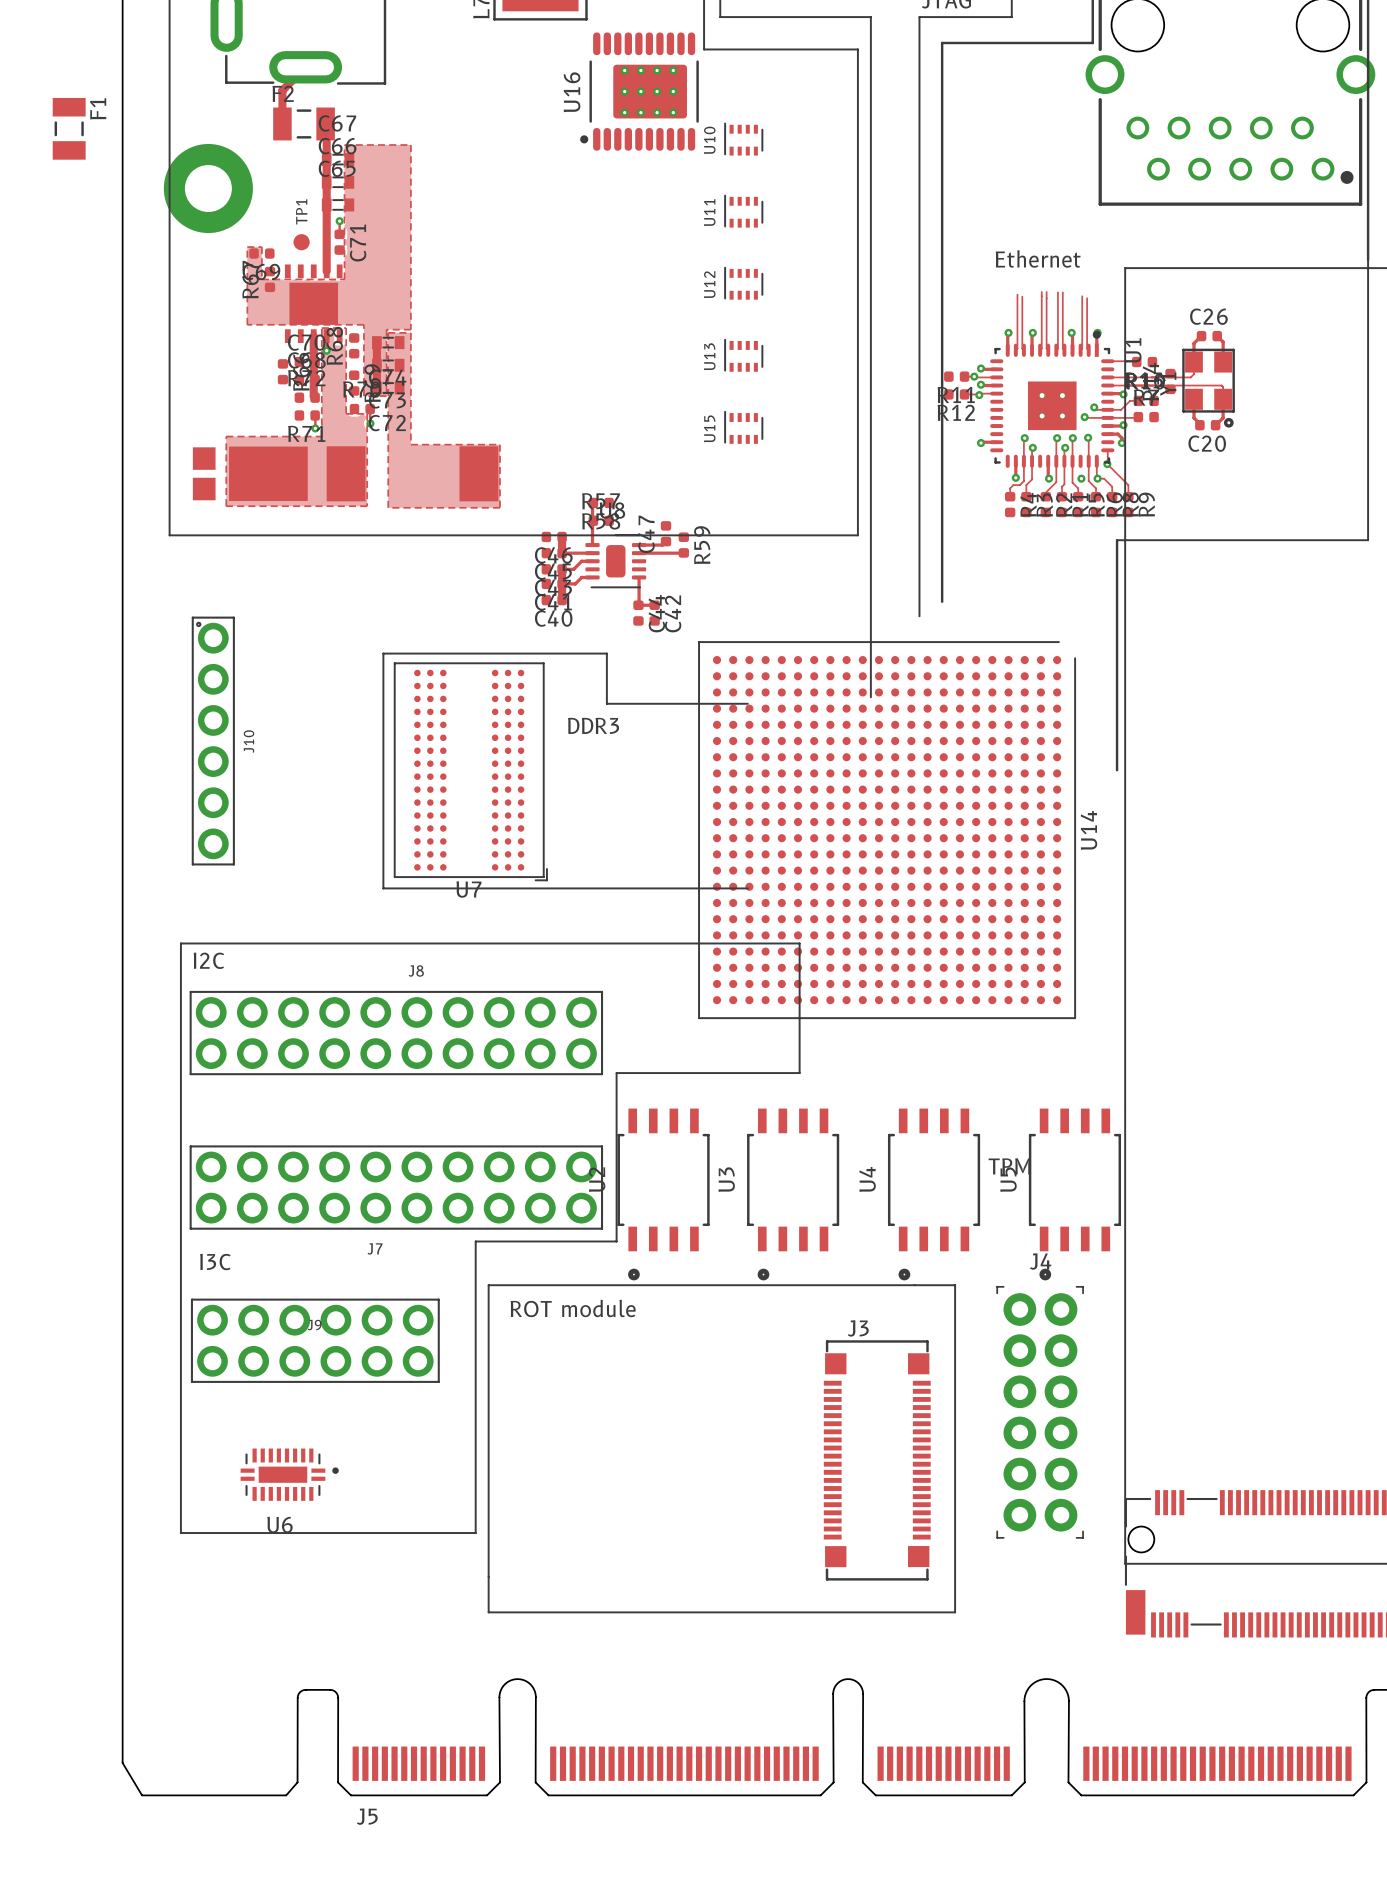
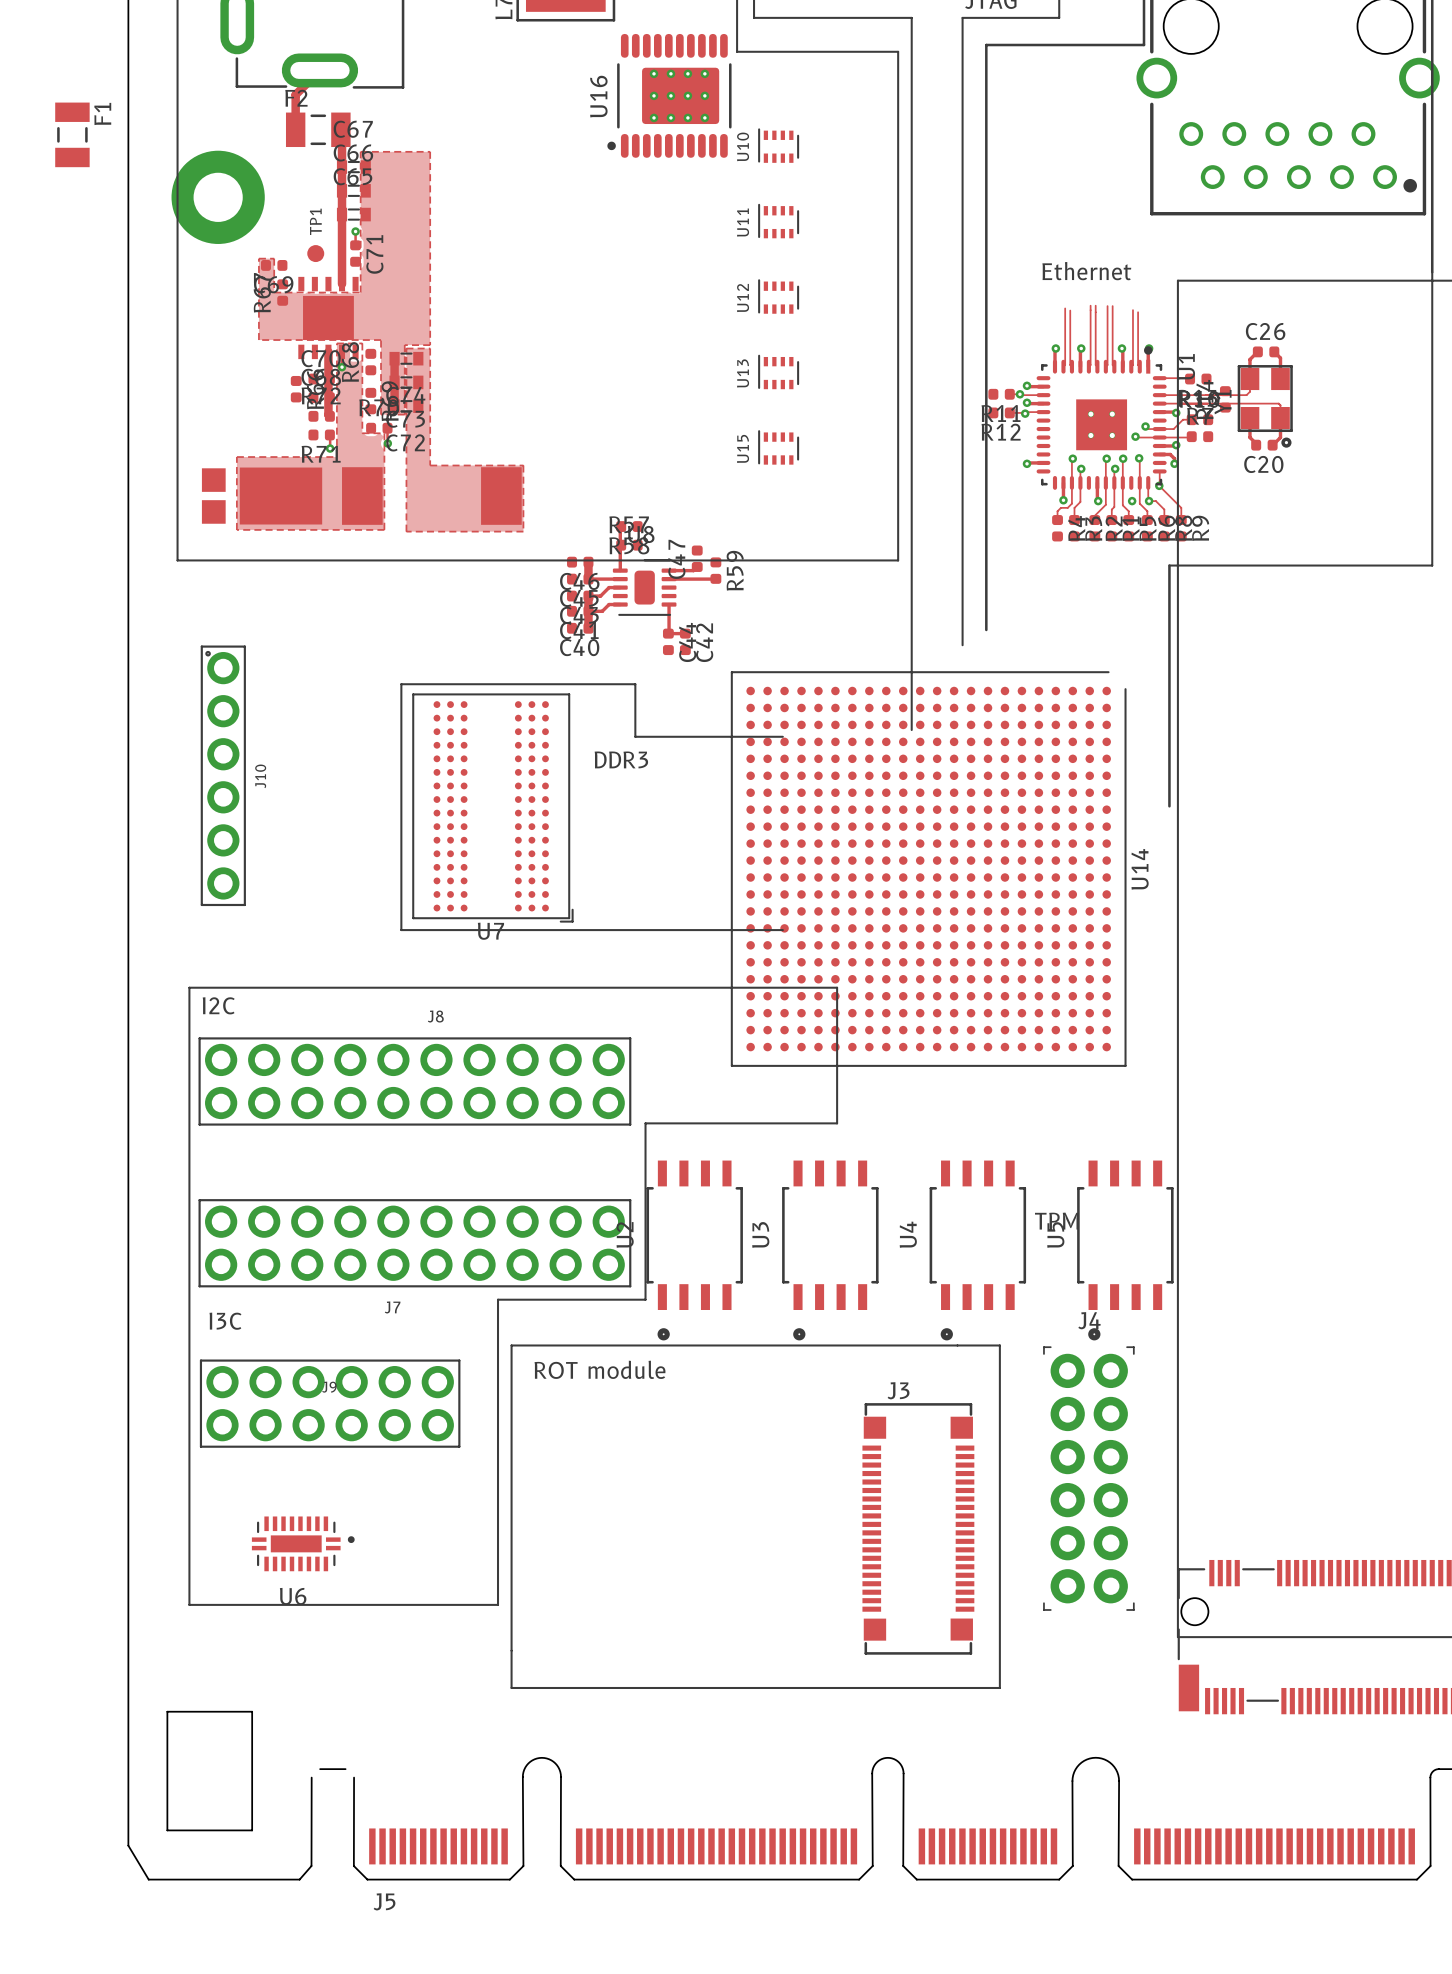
board edge: none -> (167, 1711) (252, 1711) (252, 1830) (167, 1830) (167, 1711)
board edge: (305, 1689) (300, 1692) (297, 1697) -> none
board edge: (330, 1689) (335, 1692) (338, 1697) -> none

